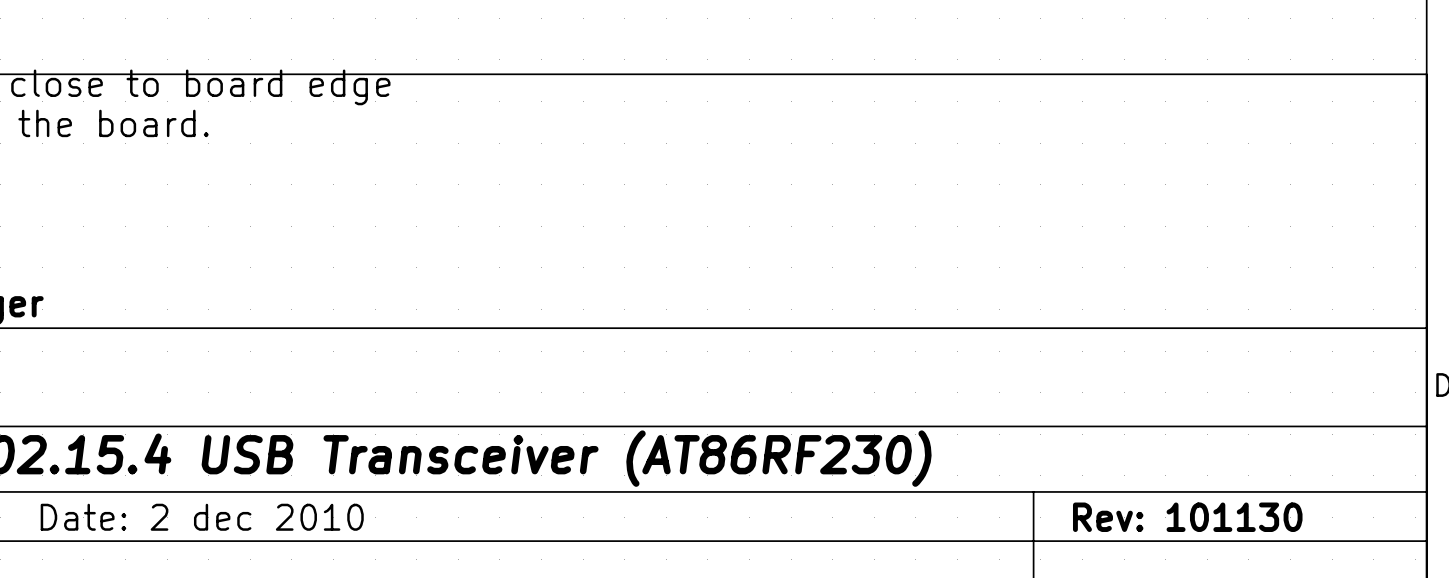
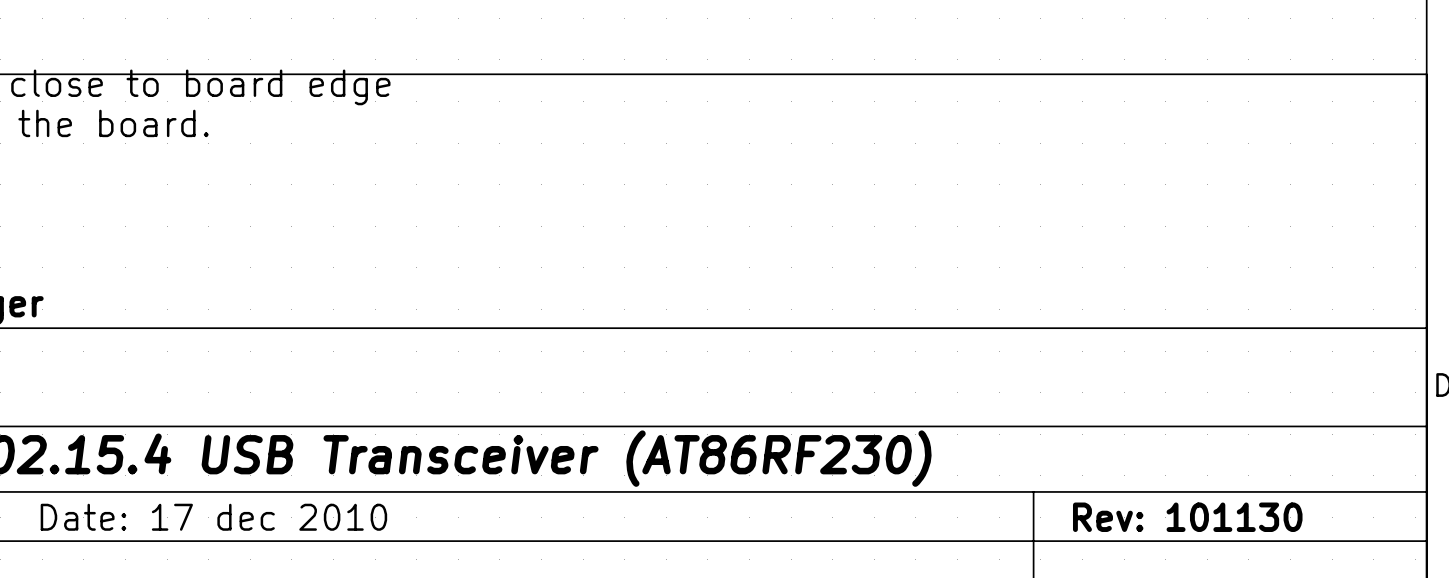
title block: Date: 2 dec 2010 (202, 517) -> Date: 17 dec 2010 (213, 517)

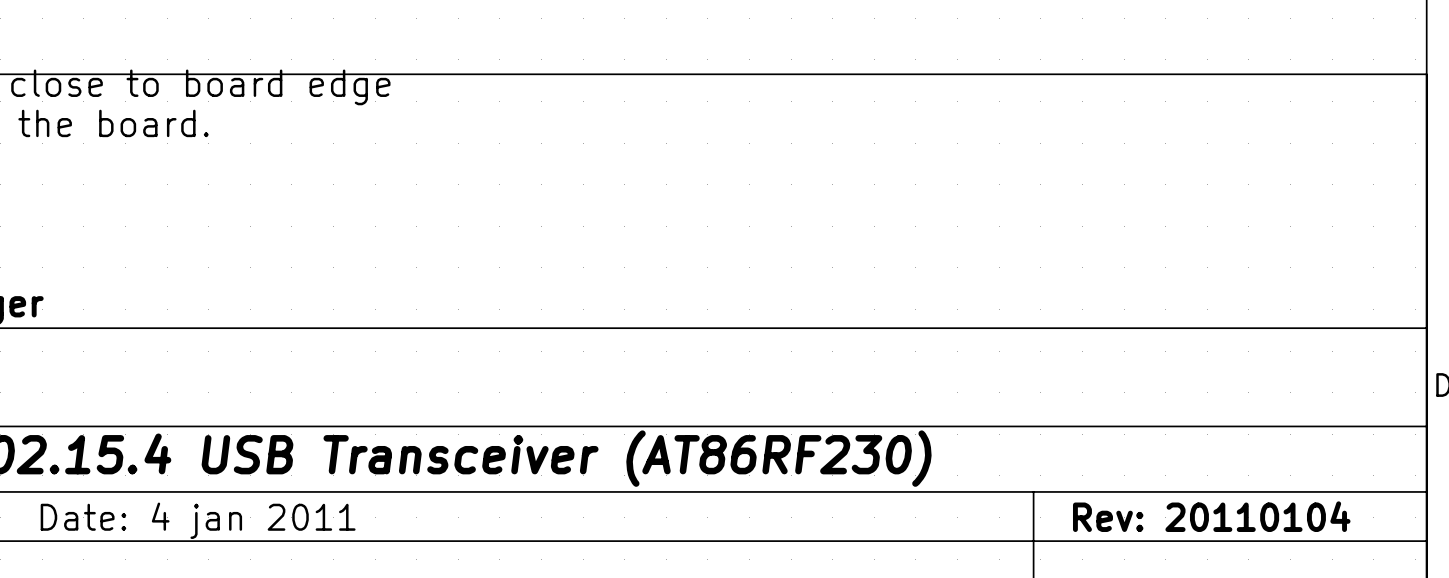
title block: Date: 17 dec 2010 (213, 517) -> Date: 4 jan 2011 (198, 520)
title block: Rev: 101130 (1187, 517) -> Rev: 20110104 (1211, 516)

